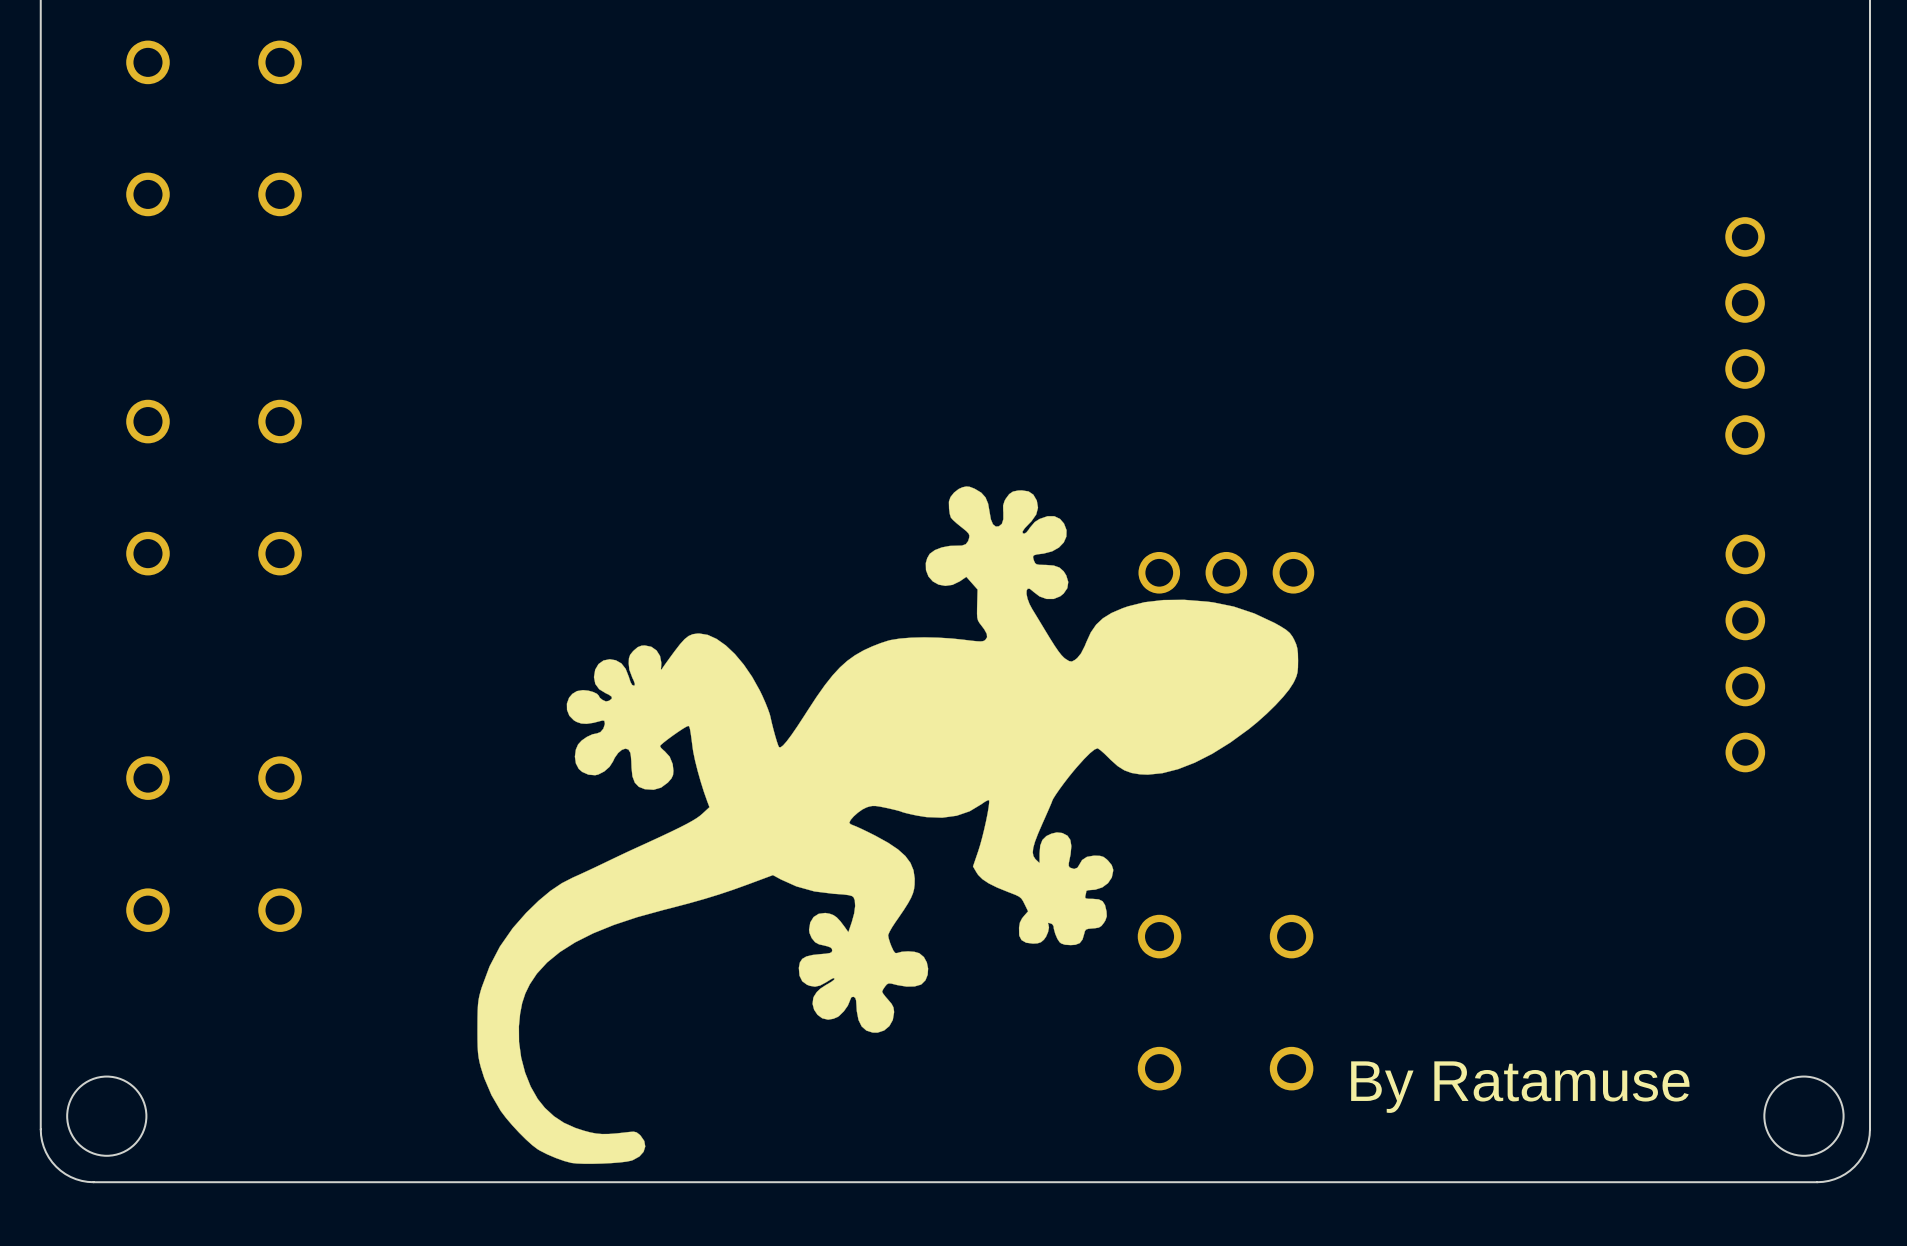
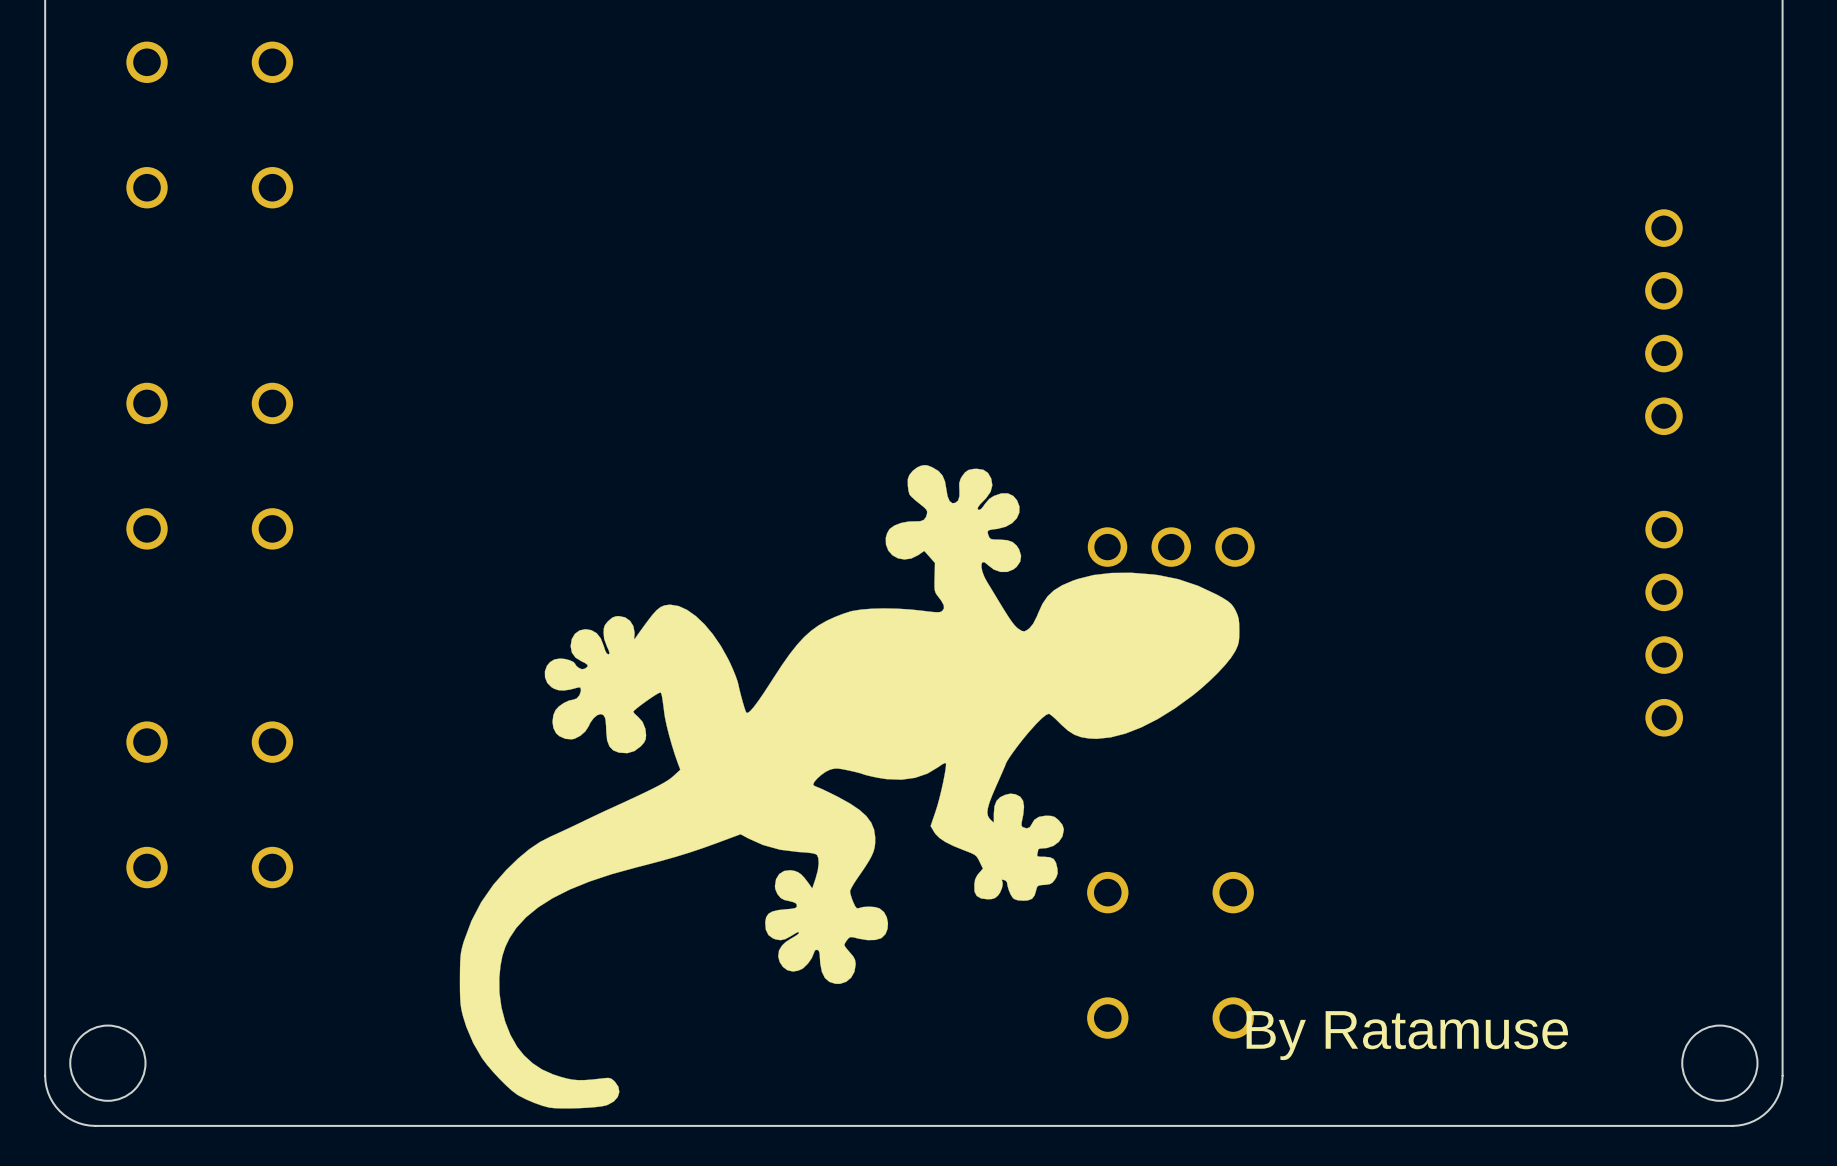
text position: By Ratamuse (1520, 1087) -> By Ratamuse (1407, 1035)

